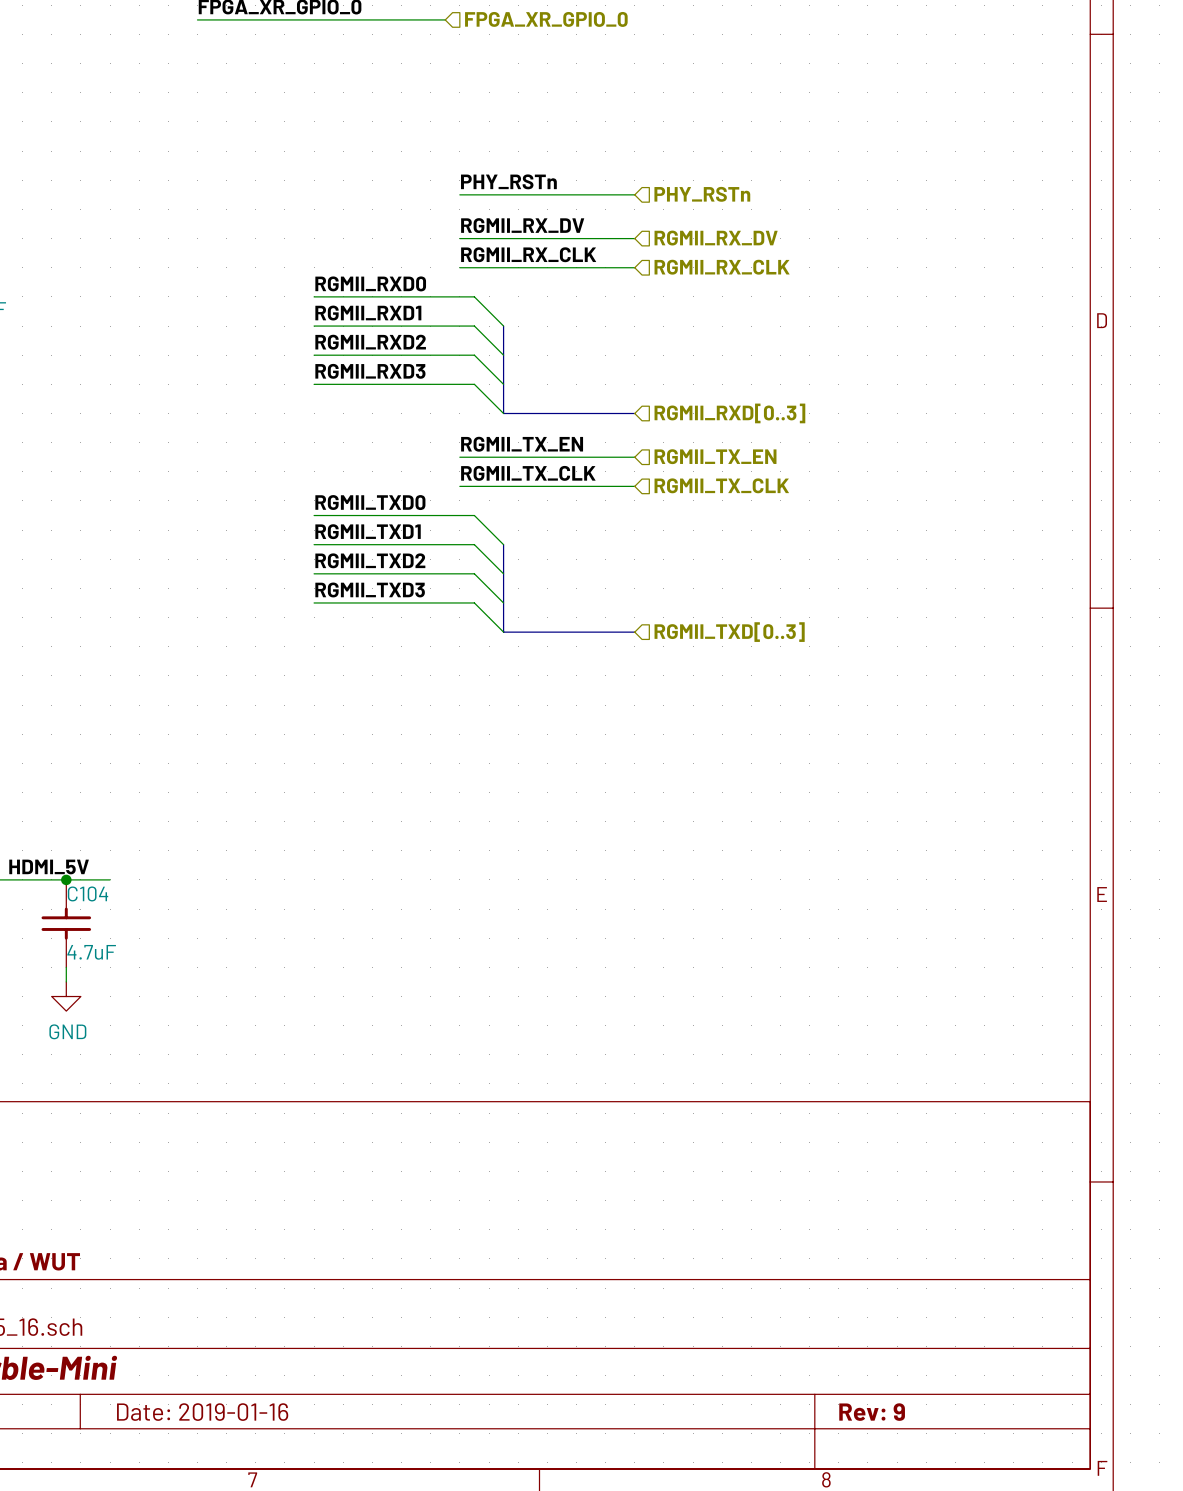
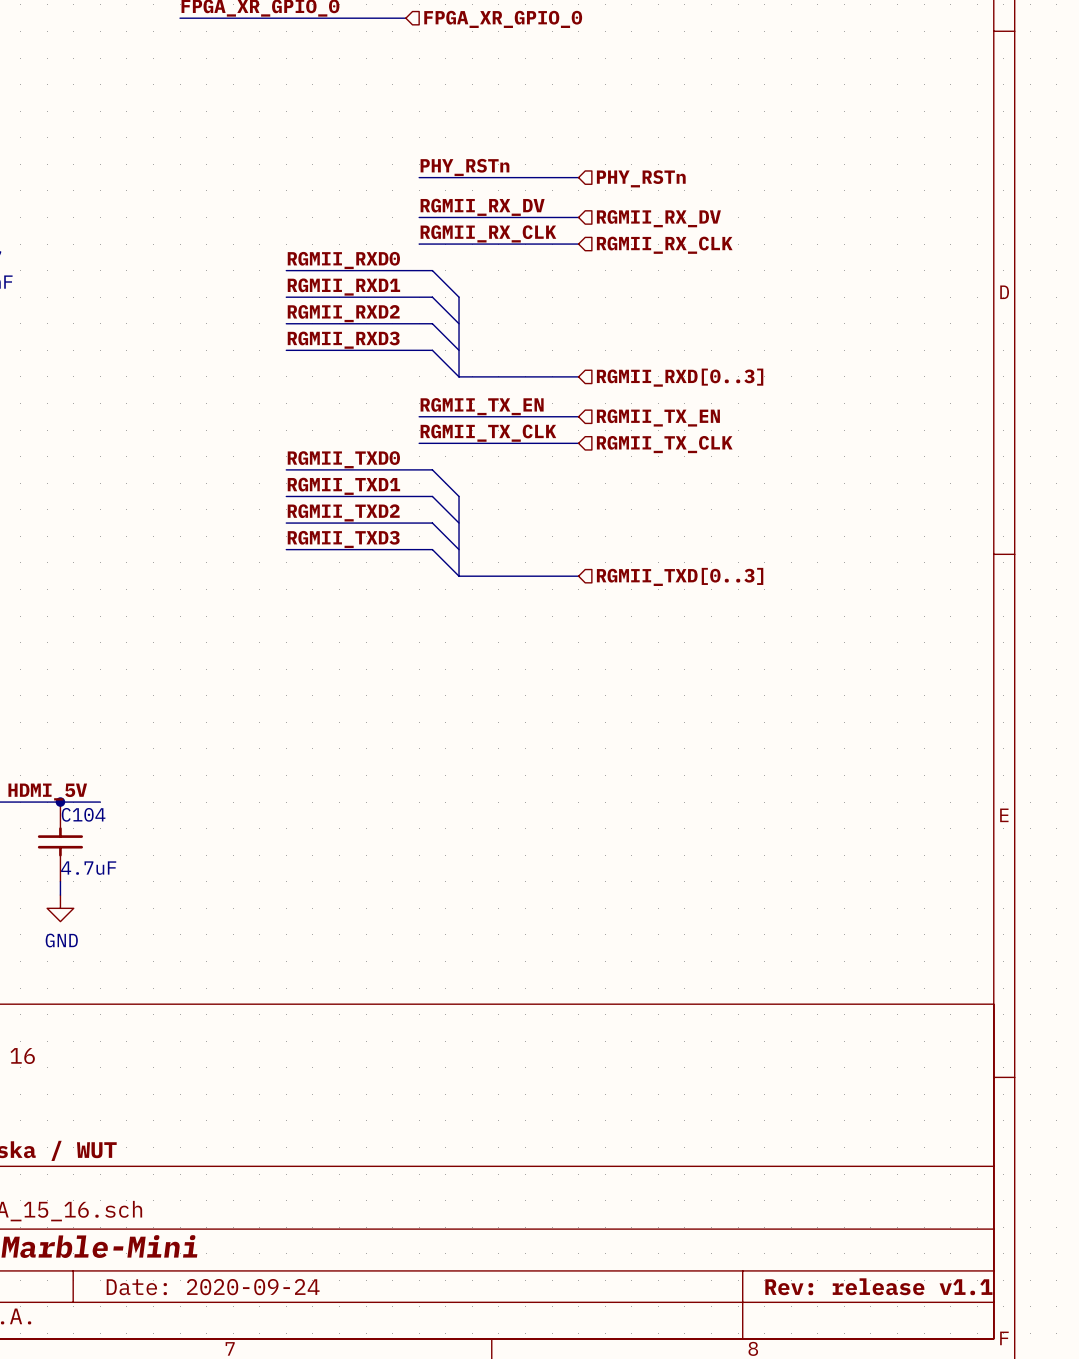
title block: Date: 2019-01-16 (202, 1412) -> Date: 2020-09-24 (213, 1287)
title block: Rev: 9 (872, 1412) -> Rev: release v1.1 (878, 1286)

